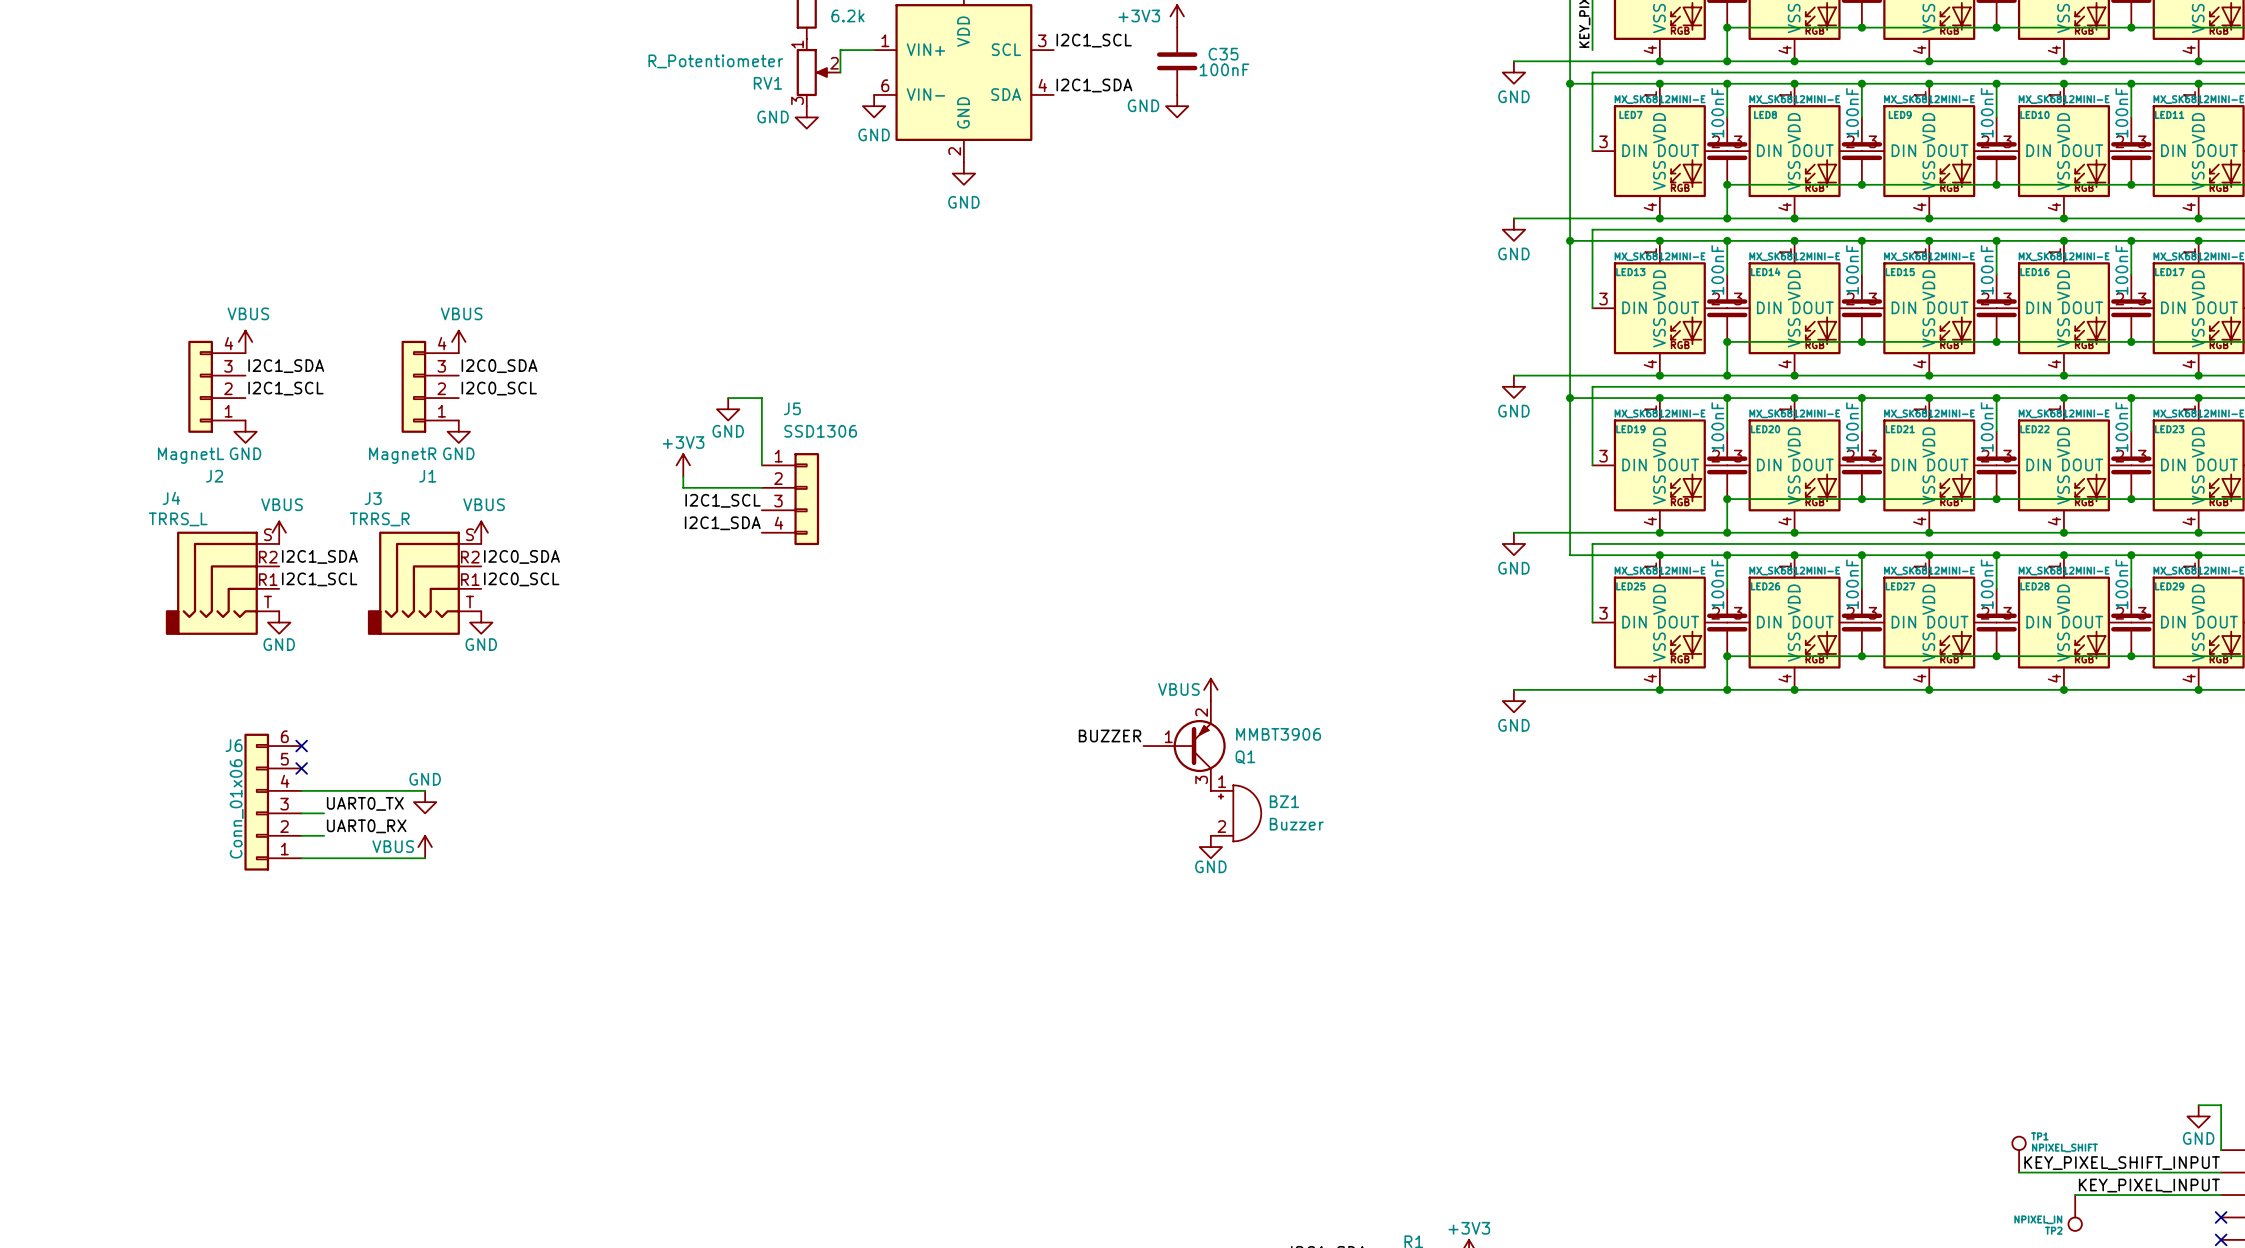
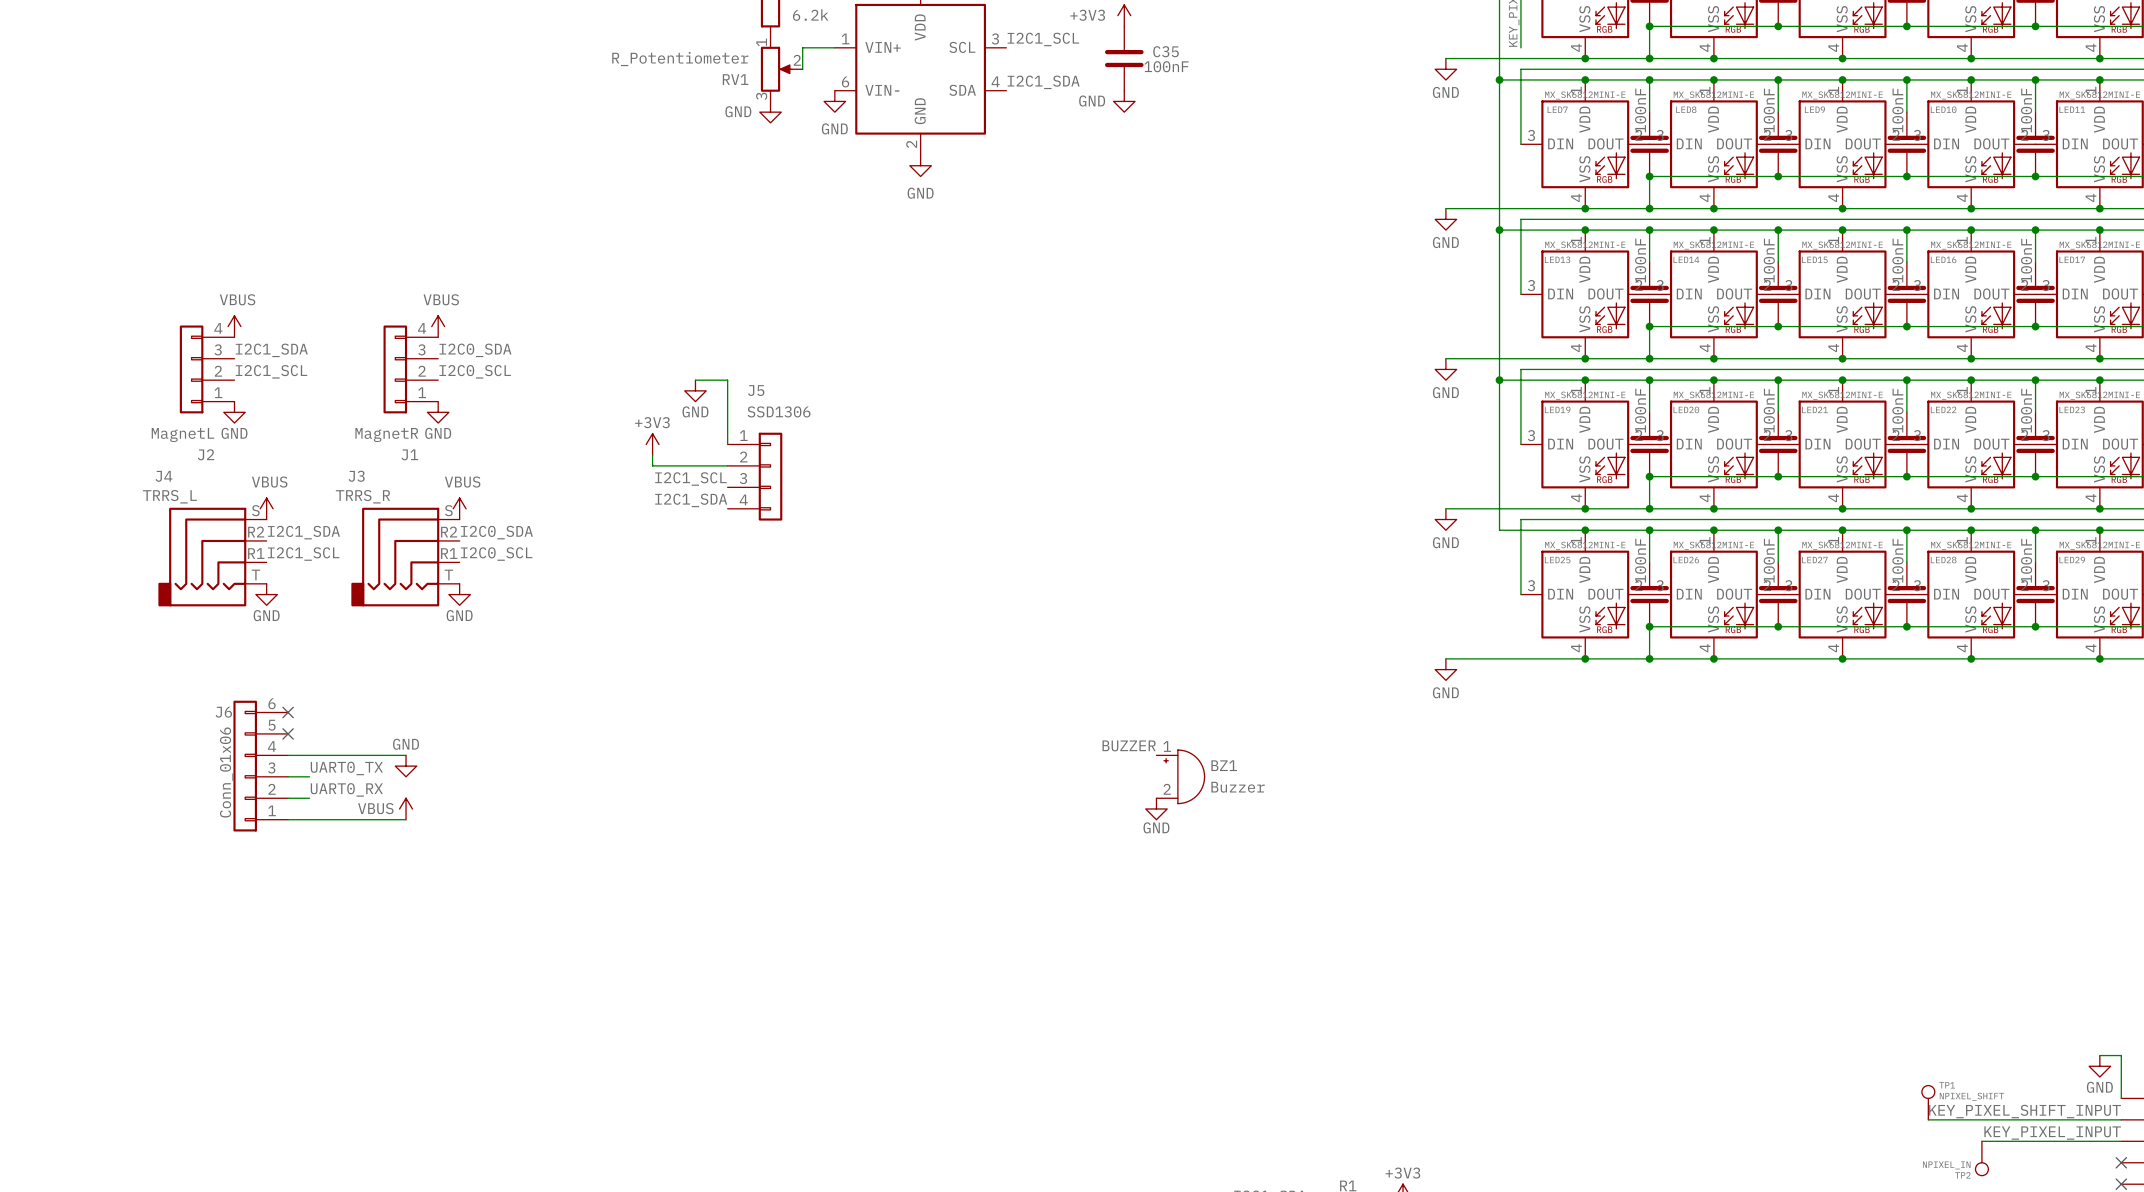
power symbol: VBUS (1210, 689) -> none
label position: BUZZER (1110, 736) -> BUZZER (1129, 745)
Q1: MMBT3906 (1184, 746) -> none

